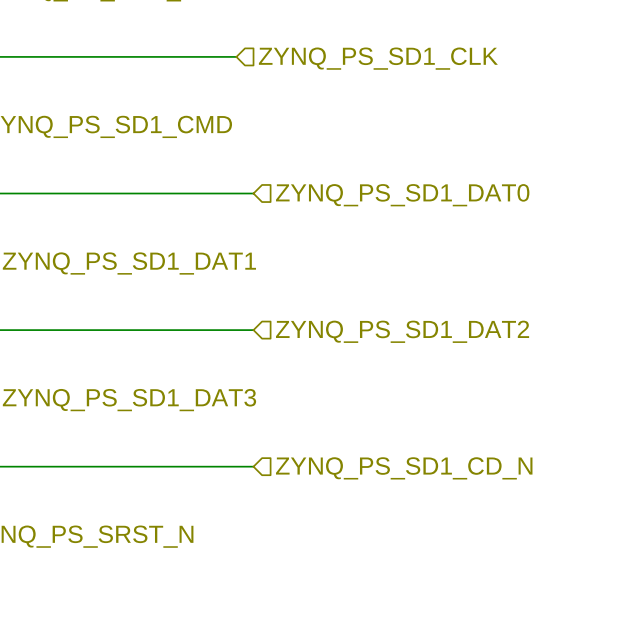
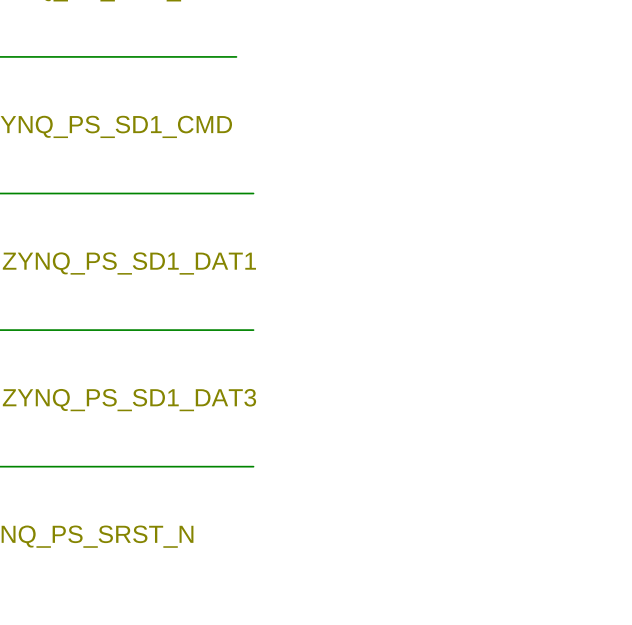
hierarchical label: ZYNQ_PS_SD1_CLK (378, 58) -> none
hierarchical label: ZYNQ_PS_SD1_DAT0 (402, 195) -> none
hierarchical label: ZYNQ_PS_SD1_DAT2 (402, 331) -> none
hierarchical label: ZYNQ_PS_SD1_CD_N (404, 468) -> none

